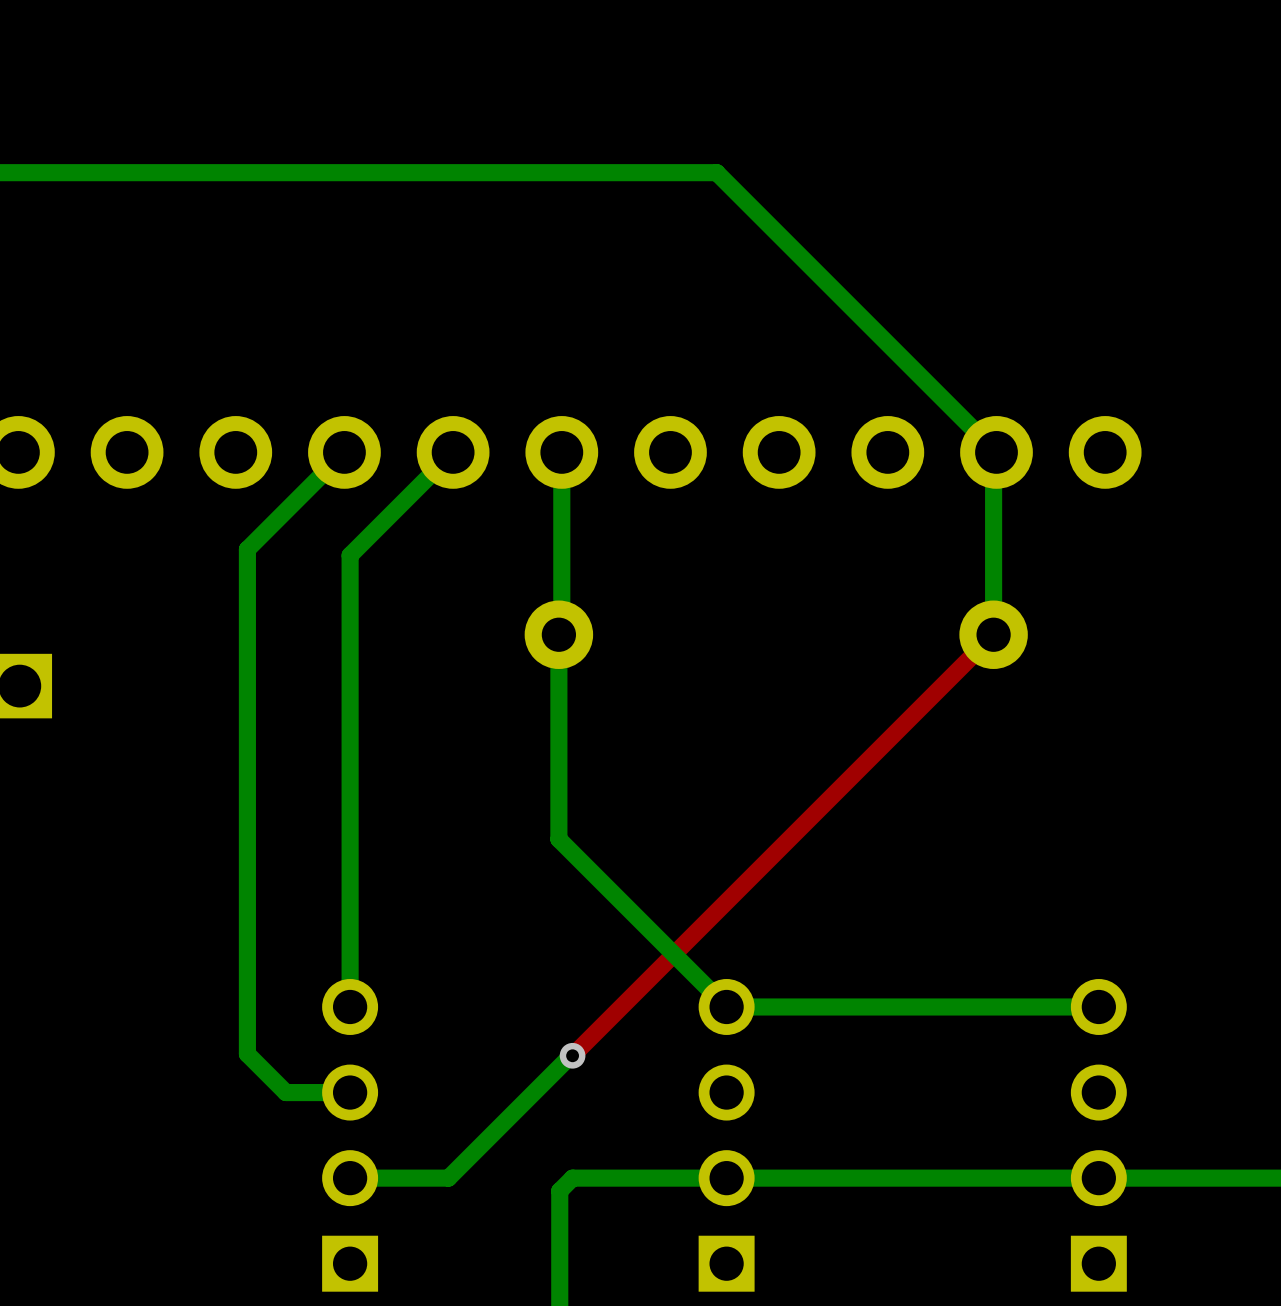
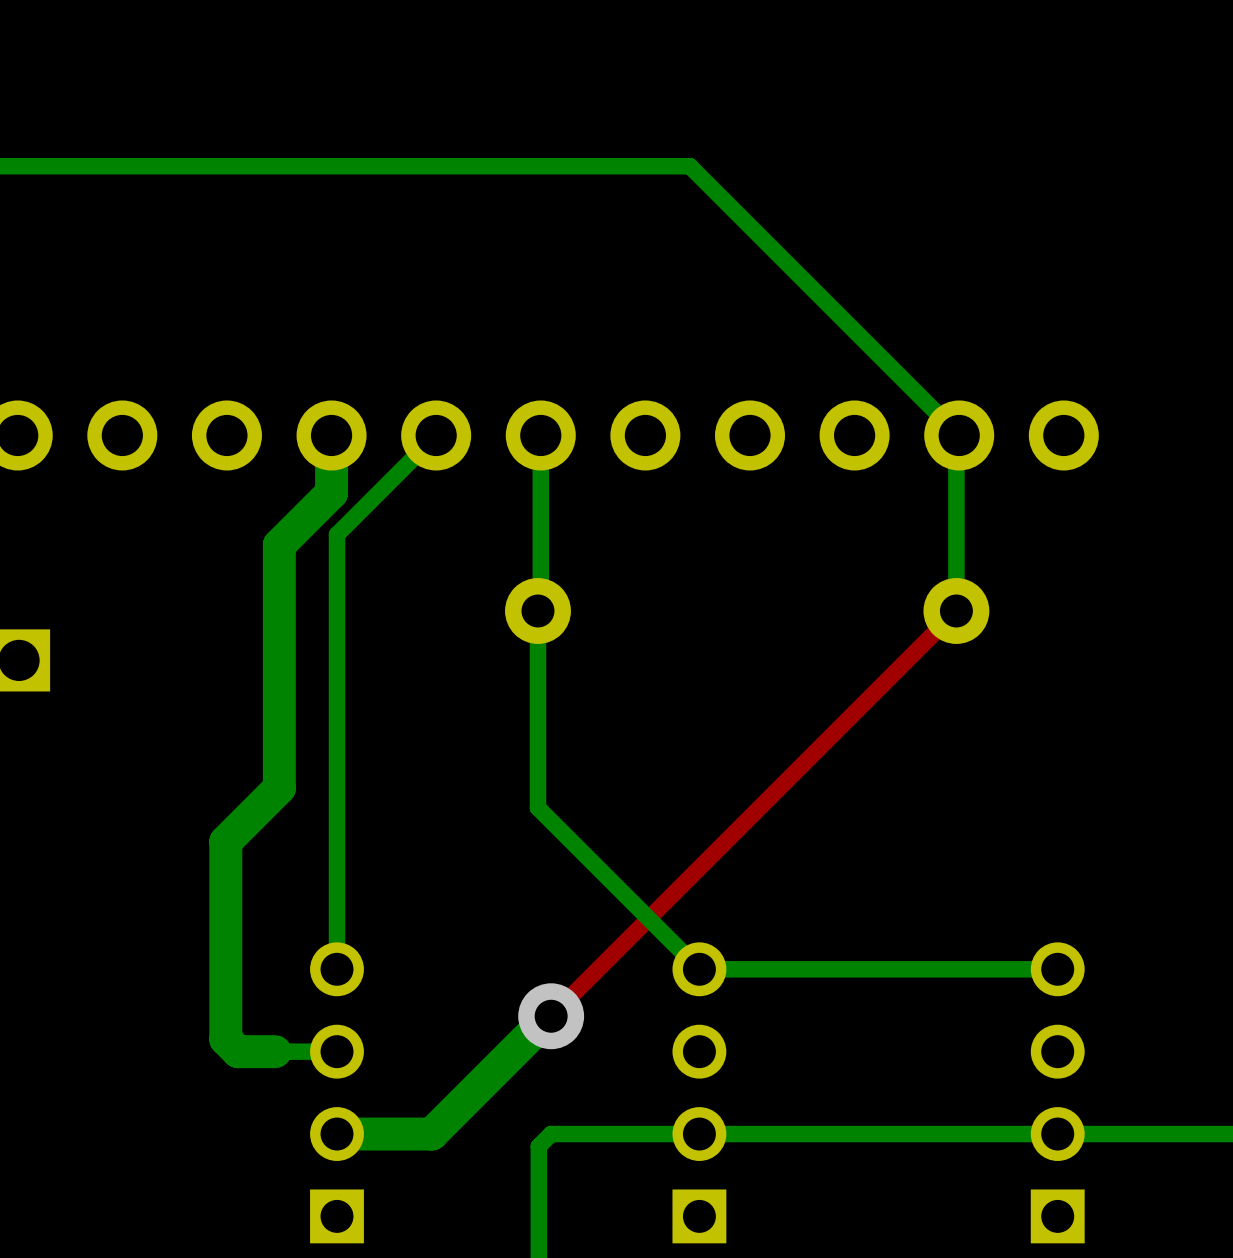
bottom track: (344, 452) (247, 549) (247, 1054) (285, 1092) -> (331, 435) (331, 492) (279, 545) (279, 788) (225, 841) (225, 1039) (238, 1051) (275, 1051)
via size: [559, 1042, 586, 1069] -> [518, 983, 585, 1050]
bottom track width: thin (572, 1055) (448, 1178) (350, 1178) -> thick (551, 1016) (431, 1134) (336, 1134)

